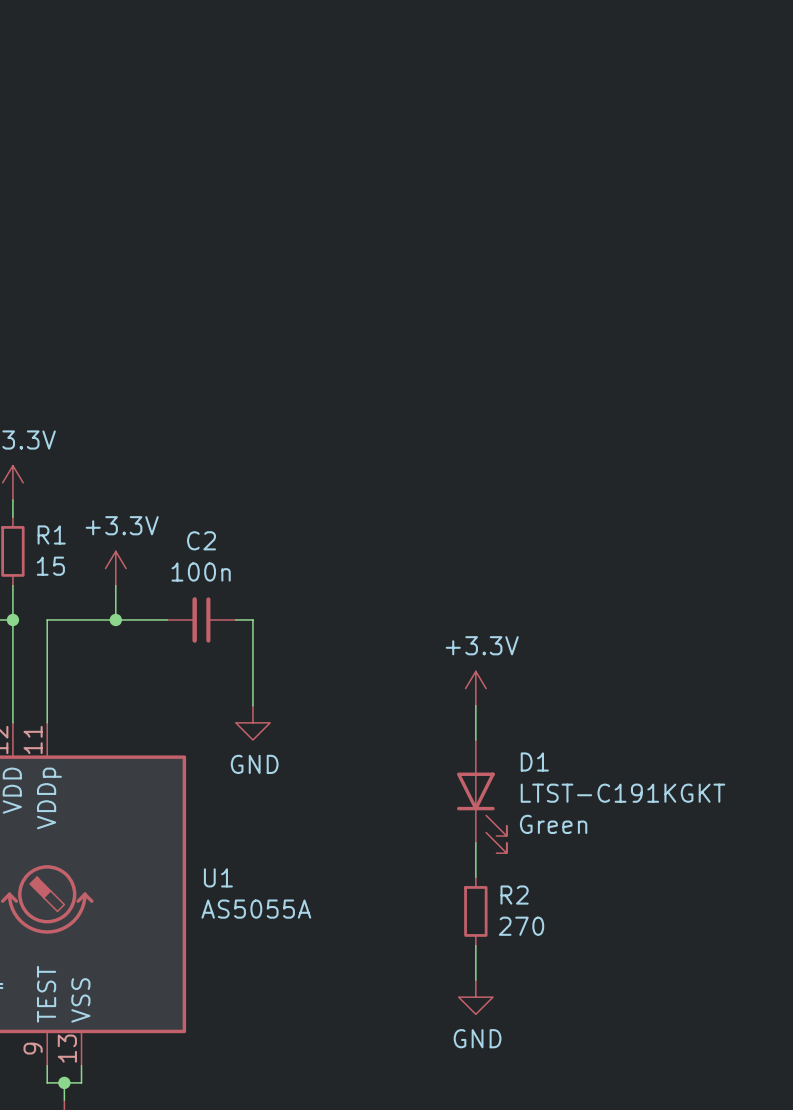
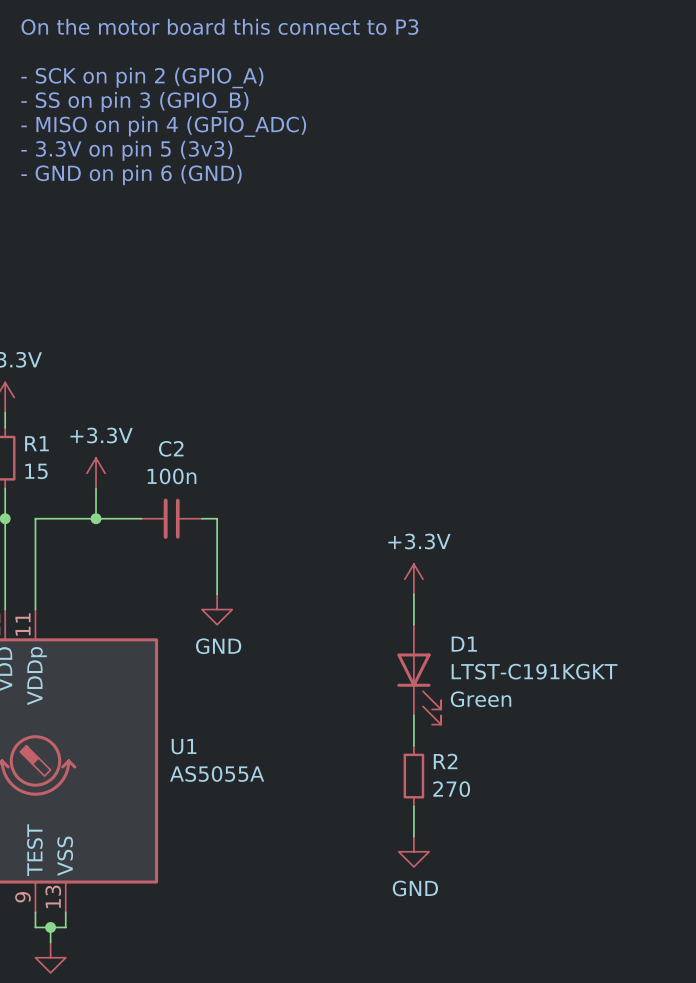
text: none -> On the motor board this connect to P3 (219, 26)
text: none -> - SCK on pin 2 (GPIO_A) (142, 77)
text: none -> - SS on pin 3 (GPIO_B) (134, 102)
text: none -> - MISO on pin 4 (GPIO_ADC) (163, 126)
text: none -> - 3.3V on pin 5 (3v3) (126, 150)
text: none -> - GND on pin 6 (GND) (131, 175)

